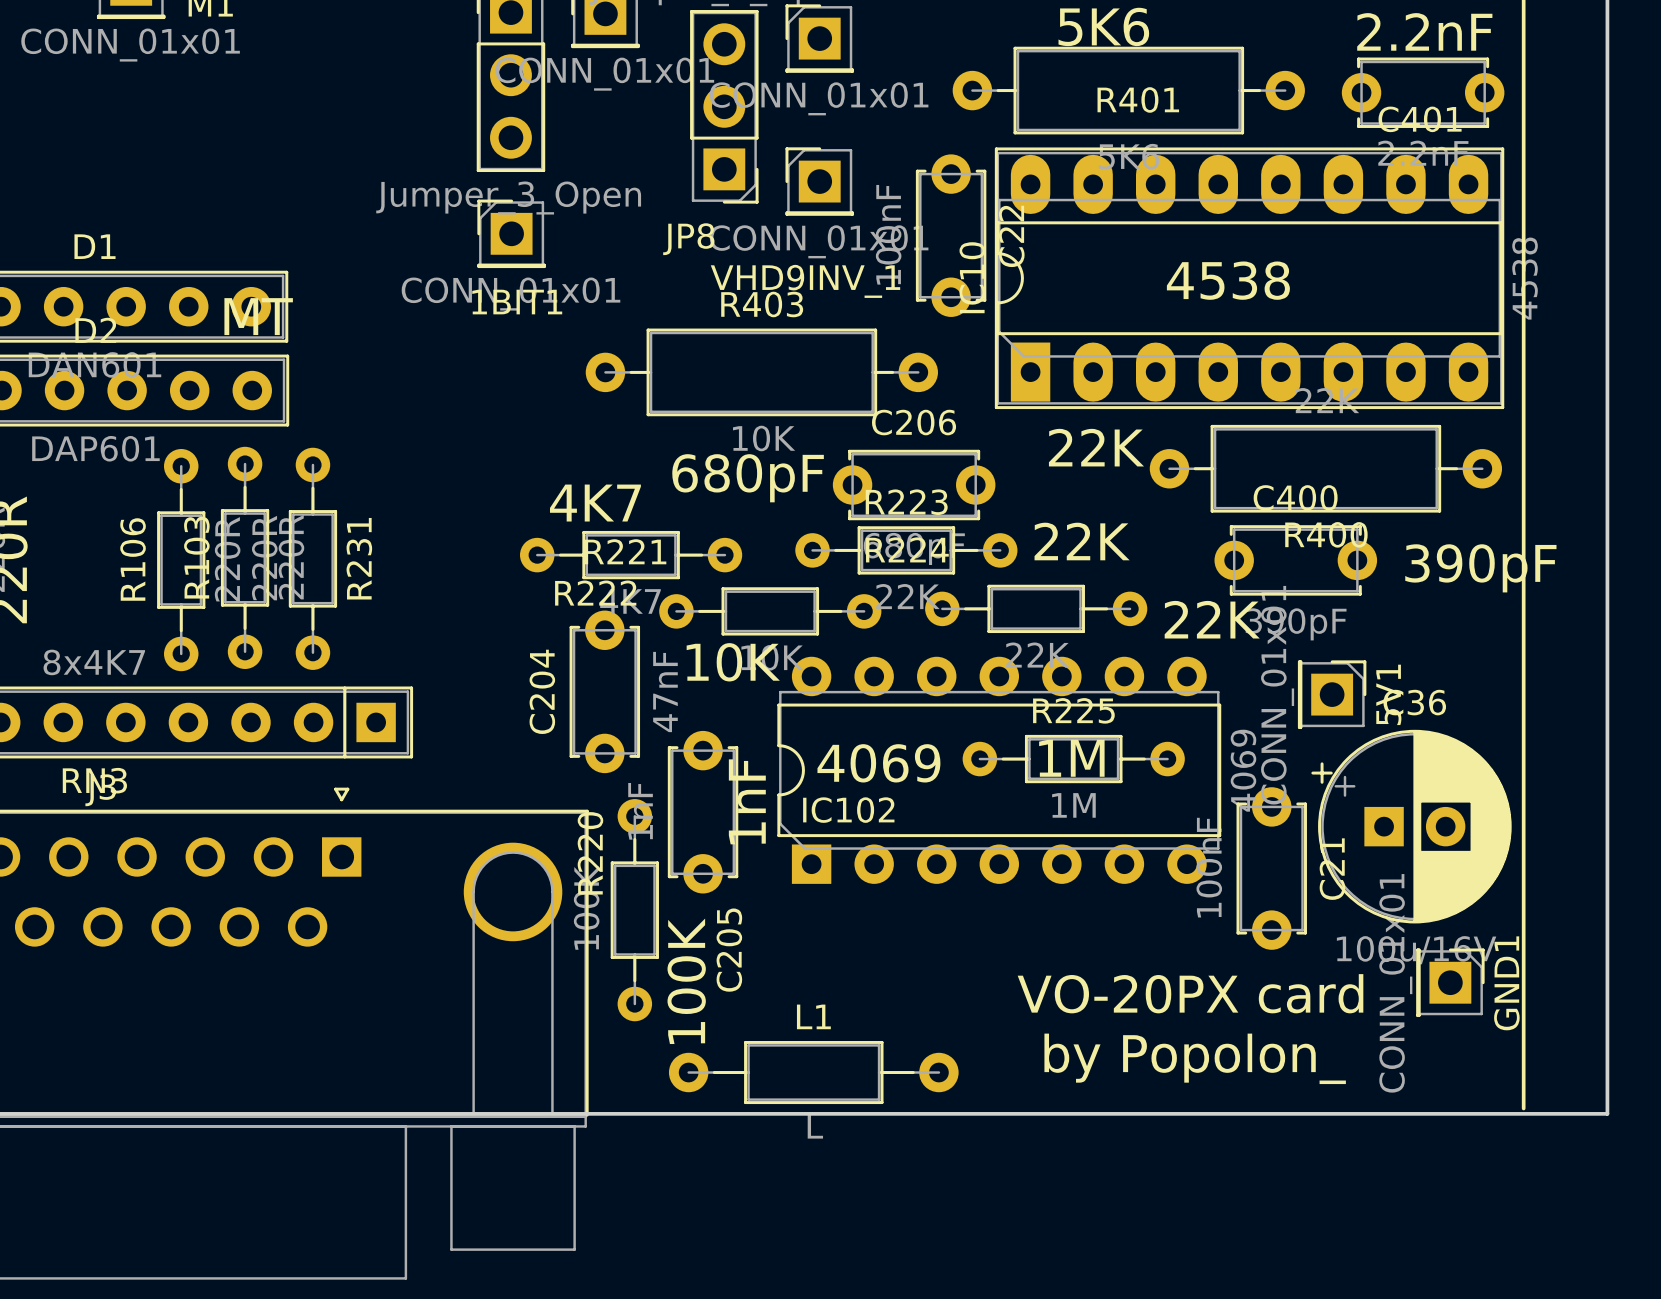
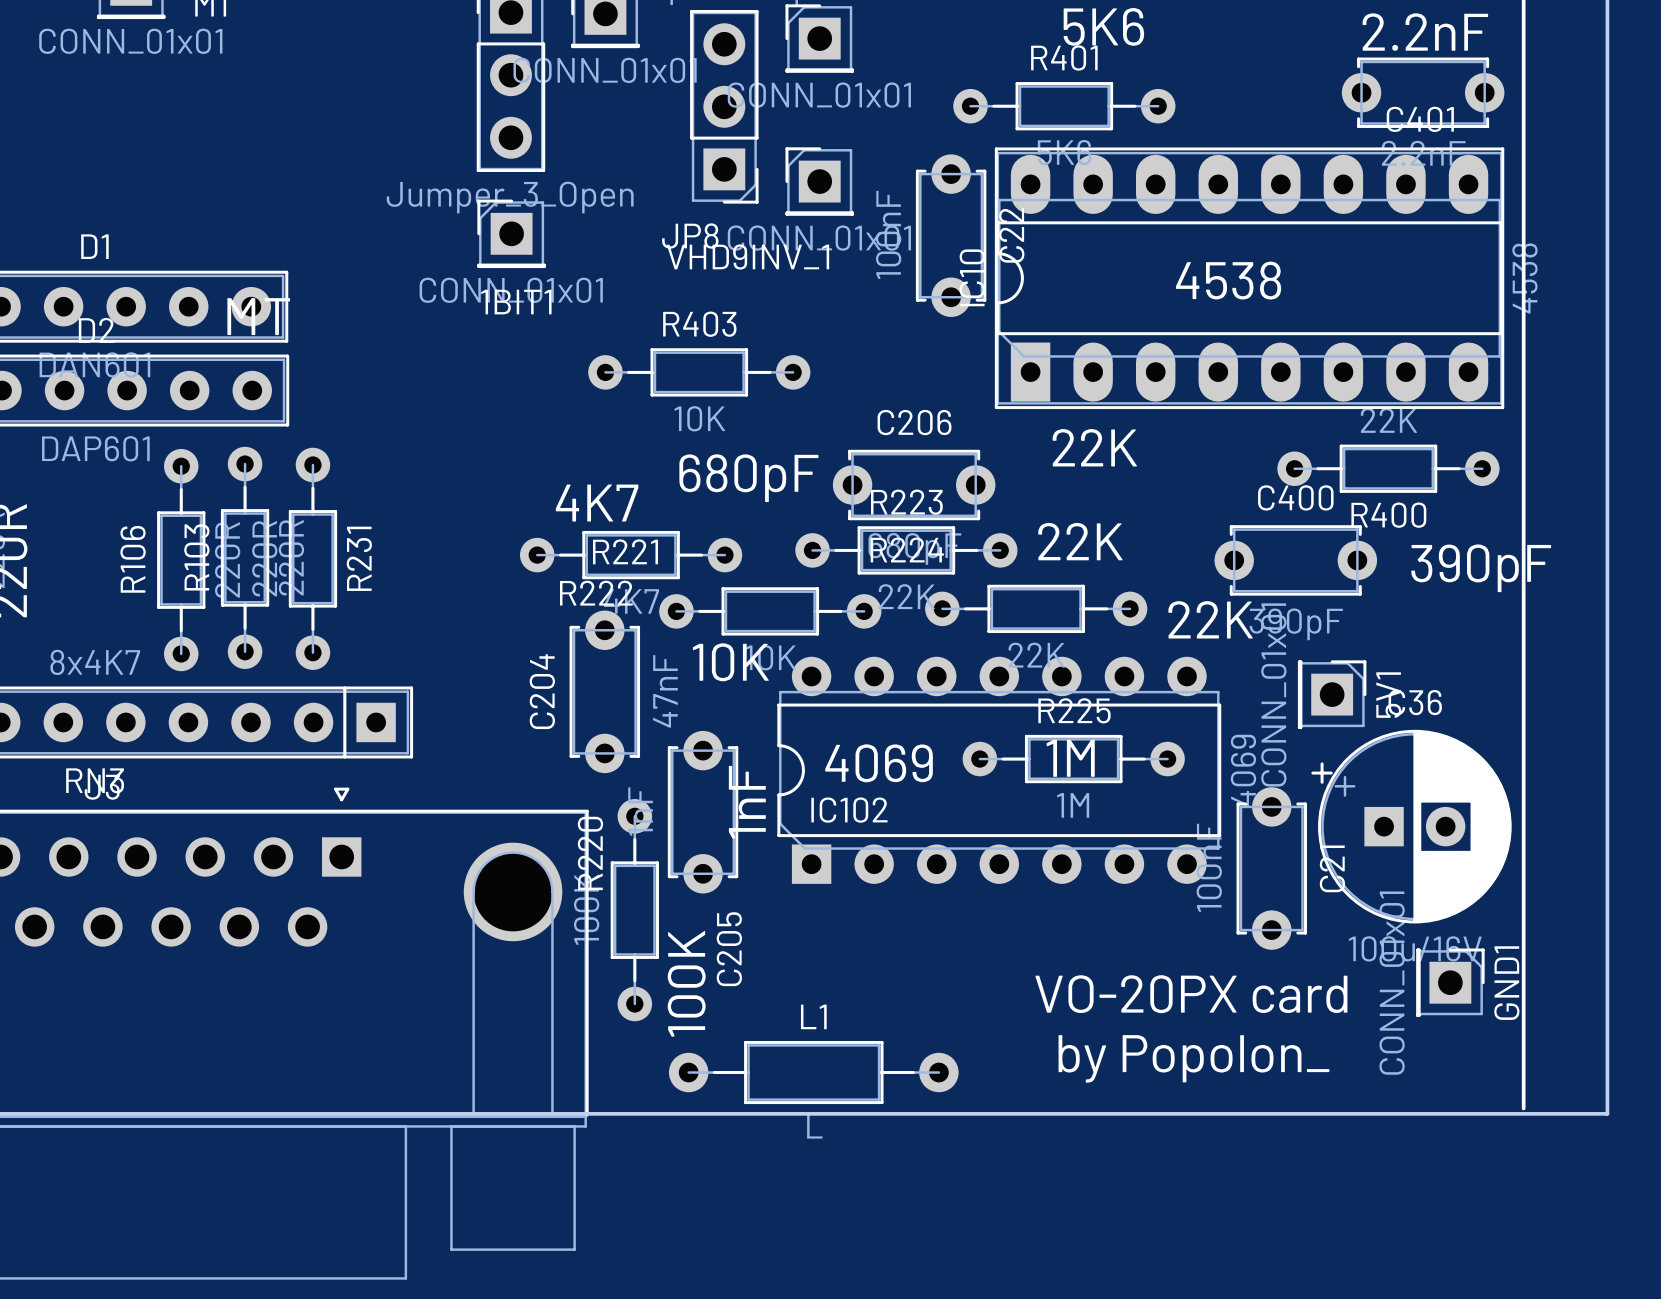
R401 footprint: [952, 46, 1305, 135] -> [953, 82, 1176, 131]
R401 name position: R401 (1138, 99) -> R401 (1064, 58)
VHD9INV_1 name position: VHD9INV_1 (805, 281) -> VHD9INV_1 (748, 257)
R403 footprint: [585, 328, 938, 417] -> [588, 348, 811, 397]
R400 footprint: [1149, 424, 1503, 513] -> [1277, 444, 1500, 493]

